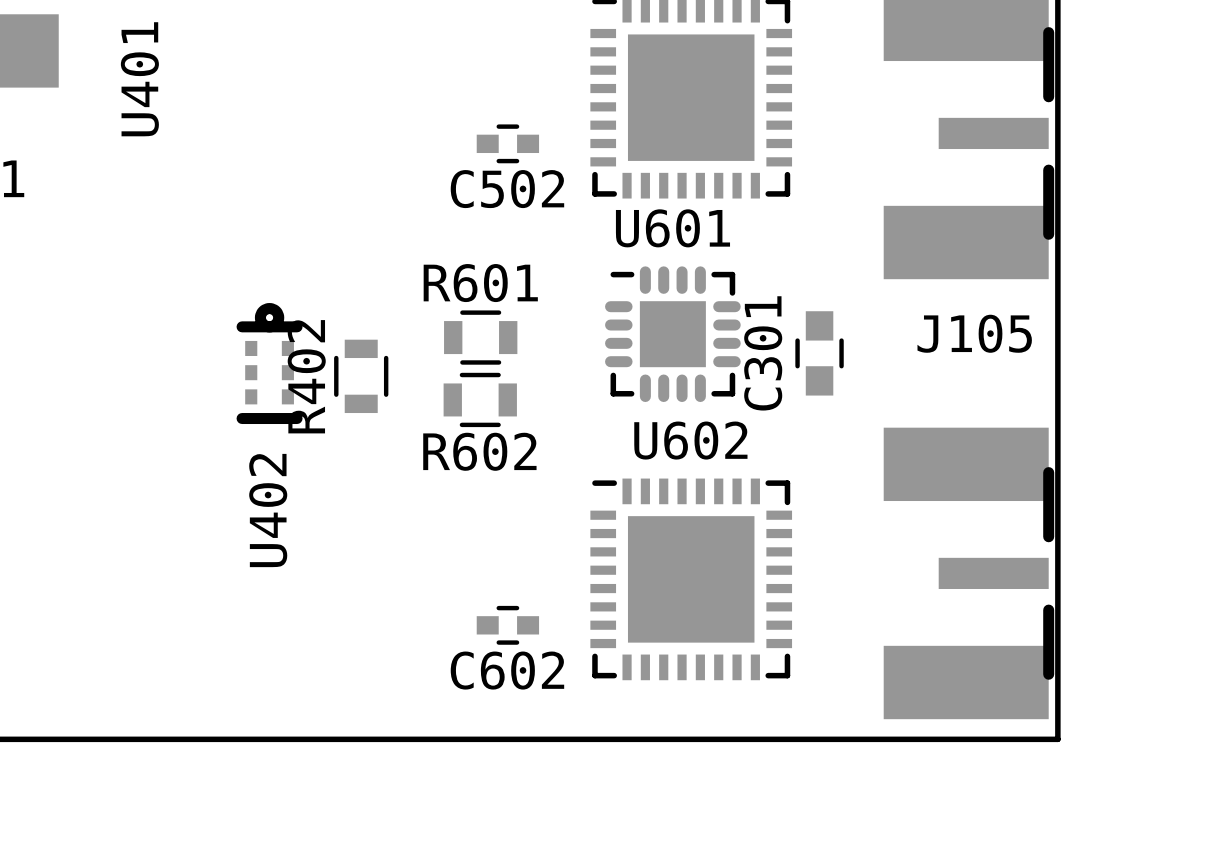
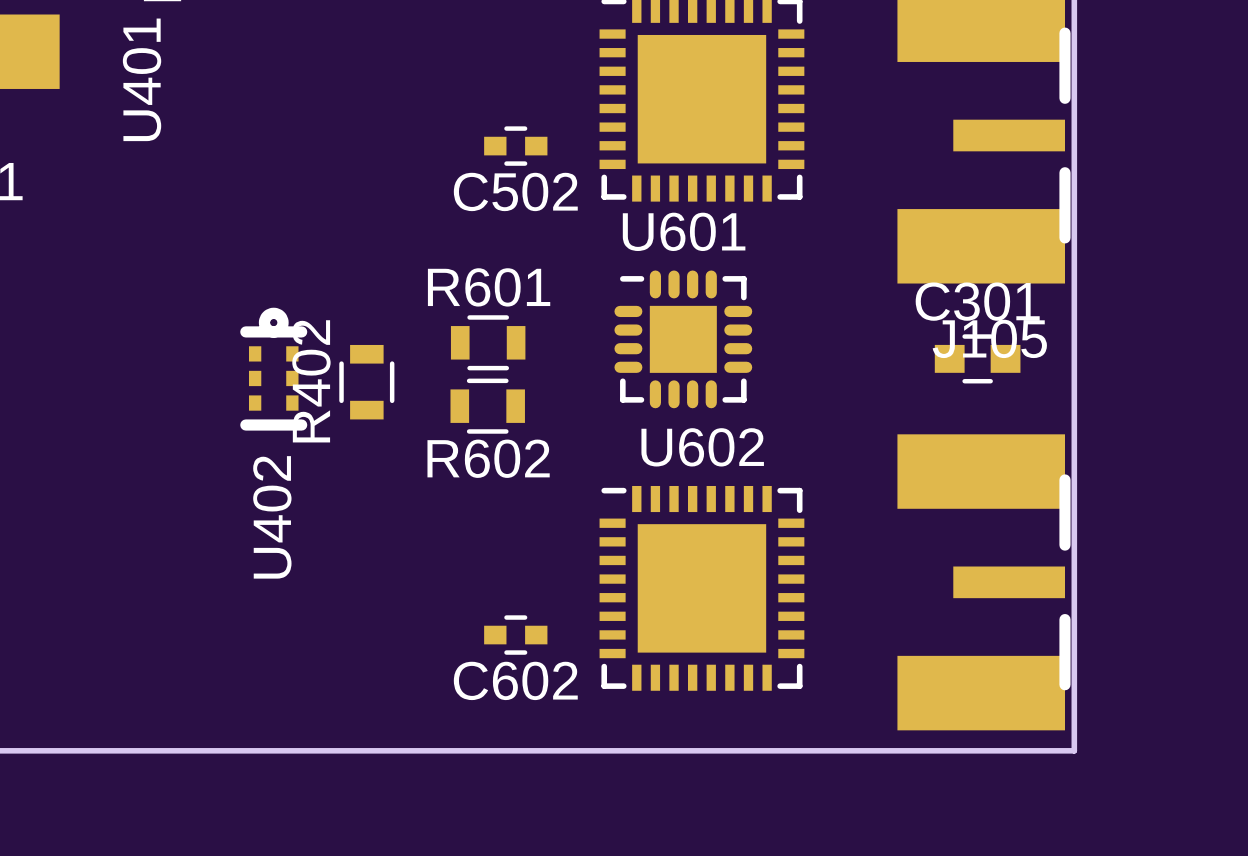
C301 rotation: 0° (819, 353) -> 90° clockwise (977, 358)
C301 position: (819, 353) -> (977, 358)

